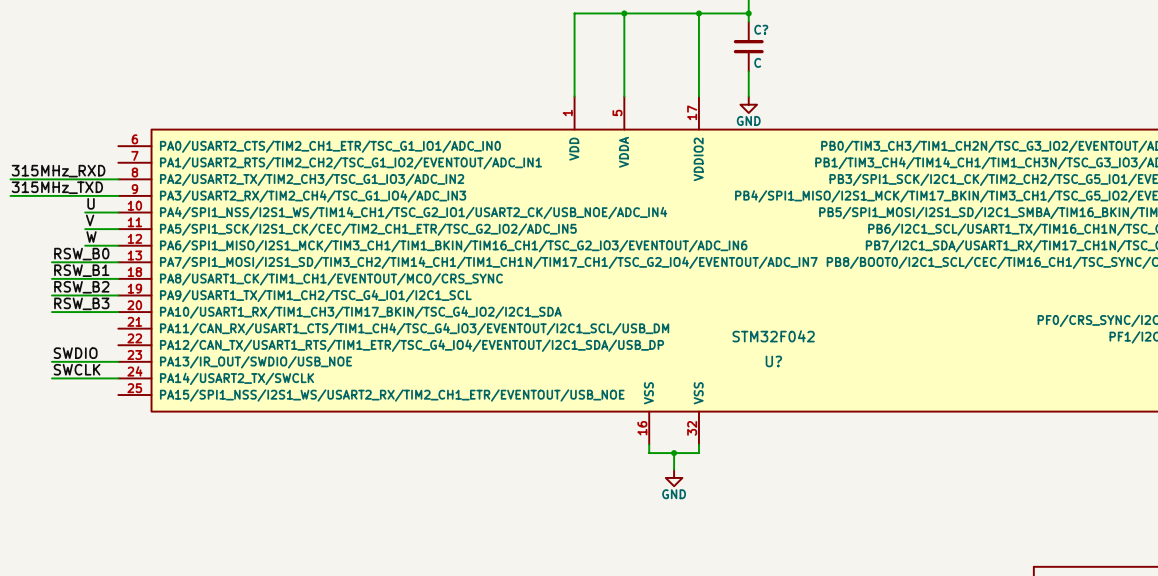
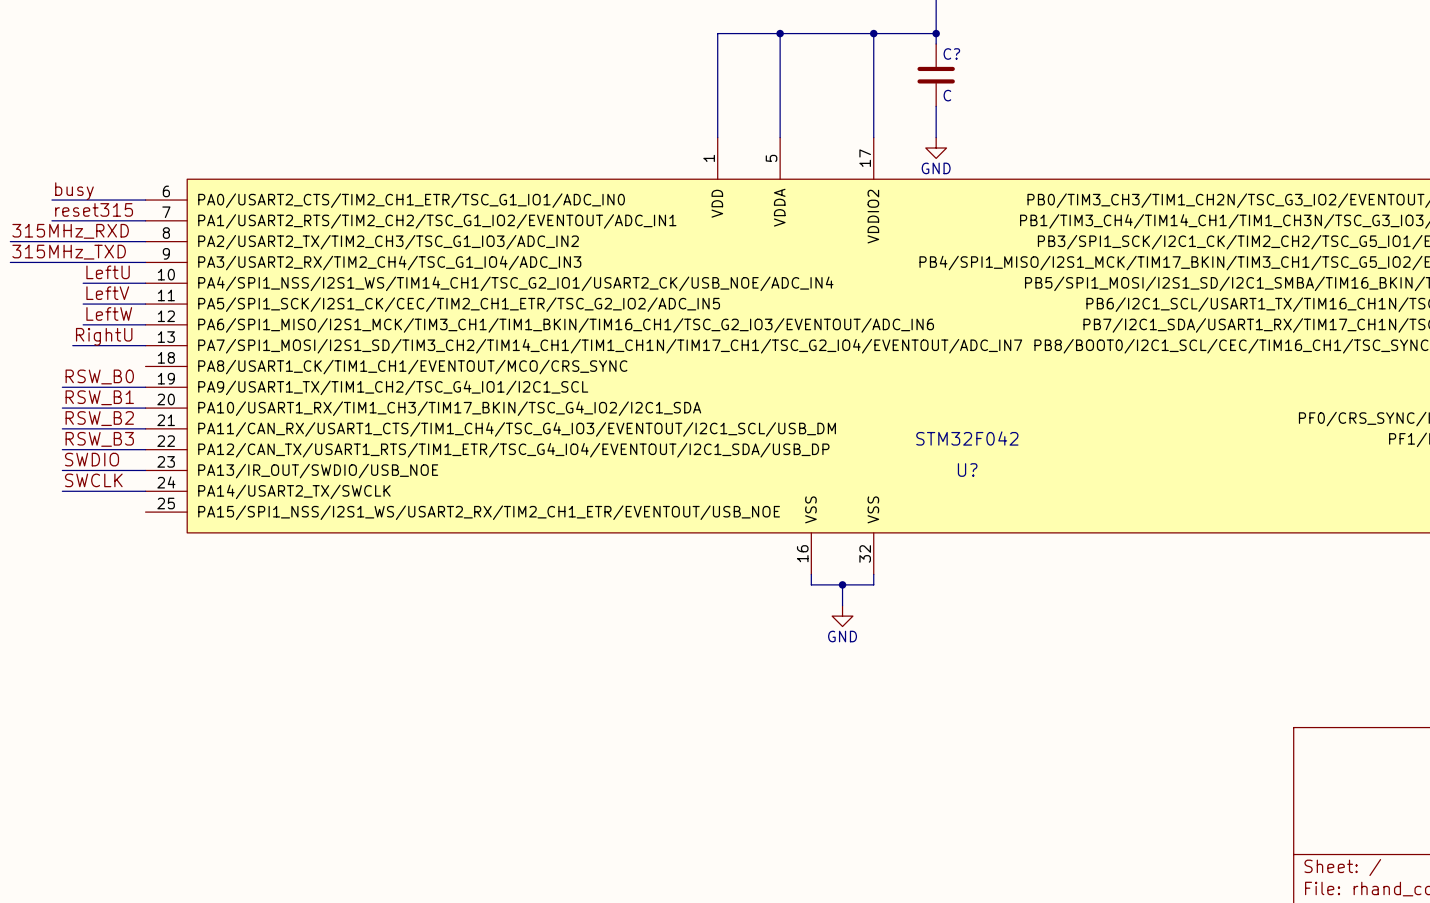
label: none -> busy (74, 191)
wire: none -> (51, 200) (145, 200)
label: none -> reset315 (94, 209)
wire: none -> (51, 220) (145, 220)
label: none -> LeftU (108, 272)
label: U (91, 203) -> none
wire: none -> (83, 283) (103, 283)
label: none -> LeftV (107, 293)
label: V (90, 220) -> none
wire: none -> (83, 304) (103, 304)
label: none -> LeftW (109, 313)
label: W (91, 237) -> none
wire: none -> (83, 324) (103, 324)
label: RSW_B0 (81, 254) -> none
label: none -> RightU (104, 336)
wire: (51, 262) (60, 262) -> none
label: RSW_B1 (81, 270) -> none
wire: (51, 278) (118, 278) -> (62, 428) (145, 428)
label: RSW_B2 (81, 287) -> RSW_B0 (99, 376)
label: RSW_B3 (81, 303) -> RSW_B1 (99, 397)
label: none -> RSW_B2 (99, 418)
label: none -> RSW_B3 (99, 439)
wire: none -> (62, 449) (145, 449)

